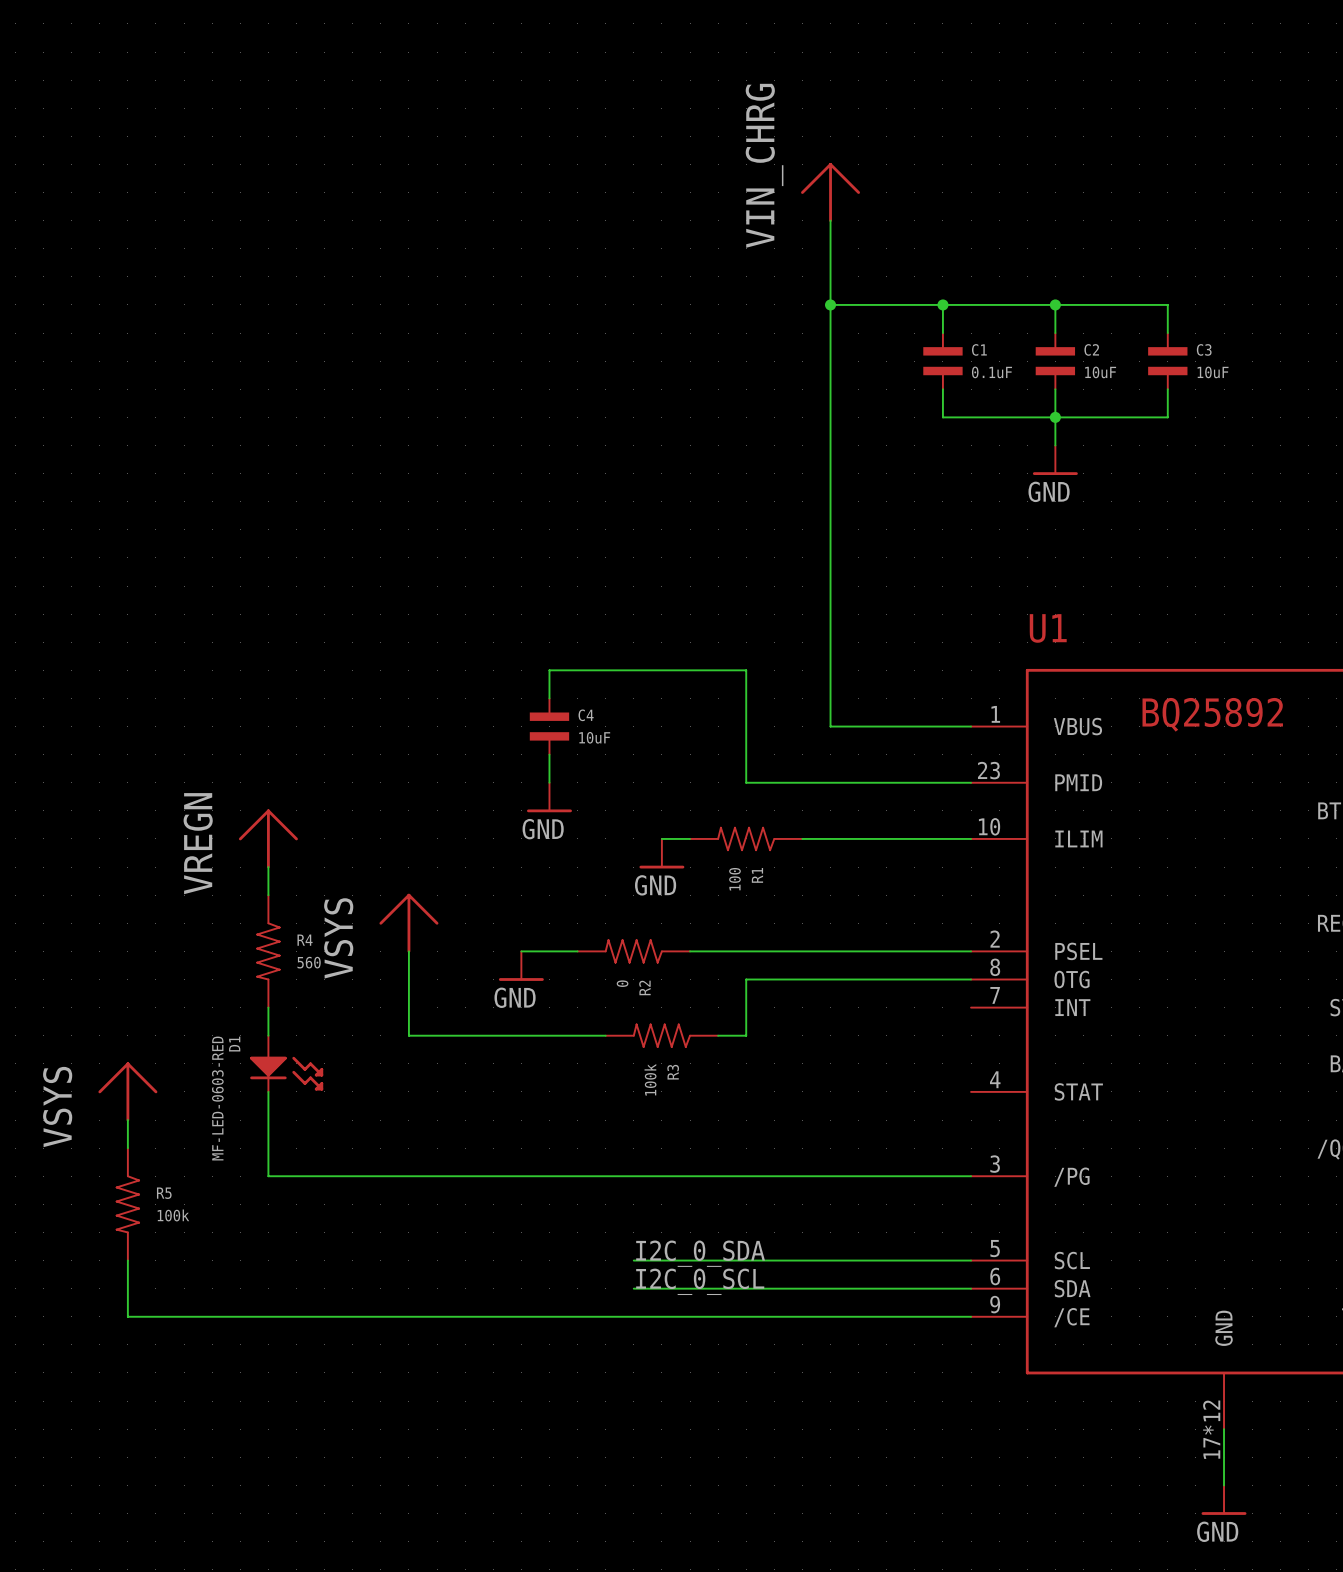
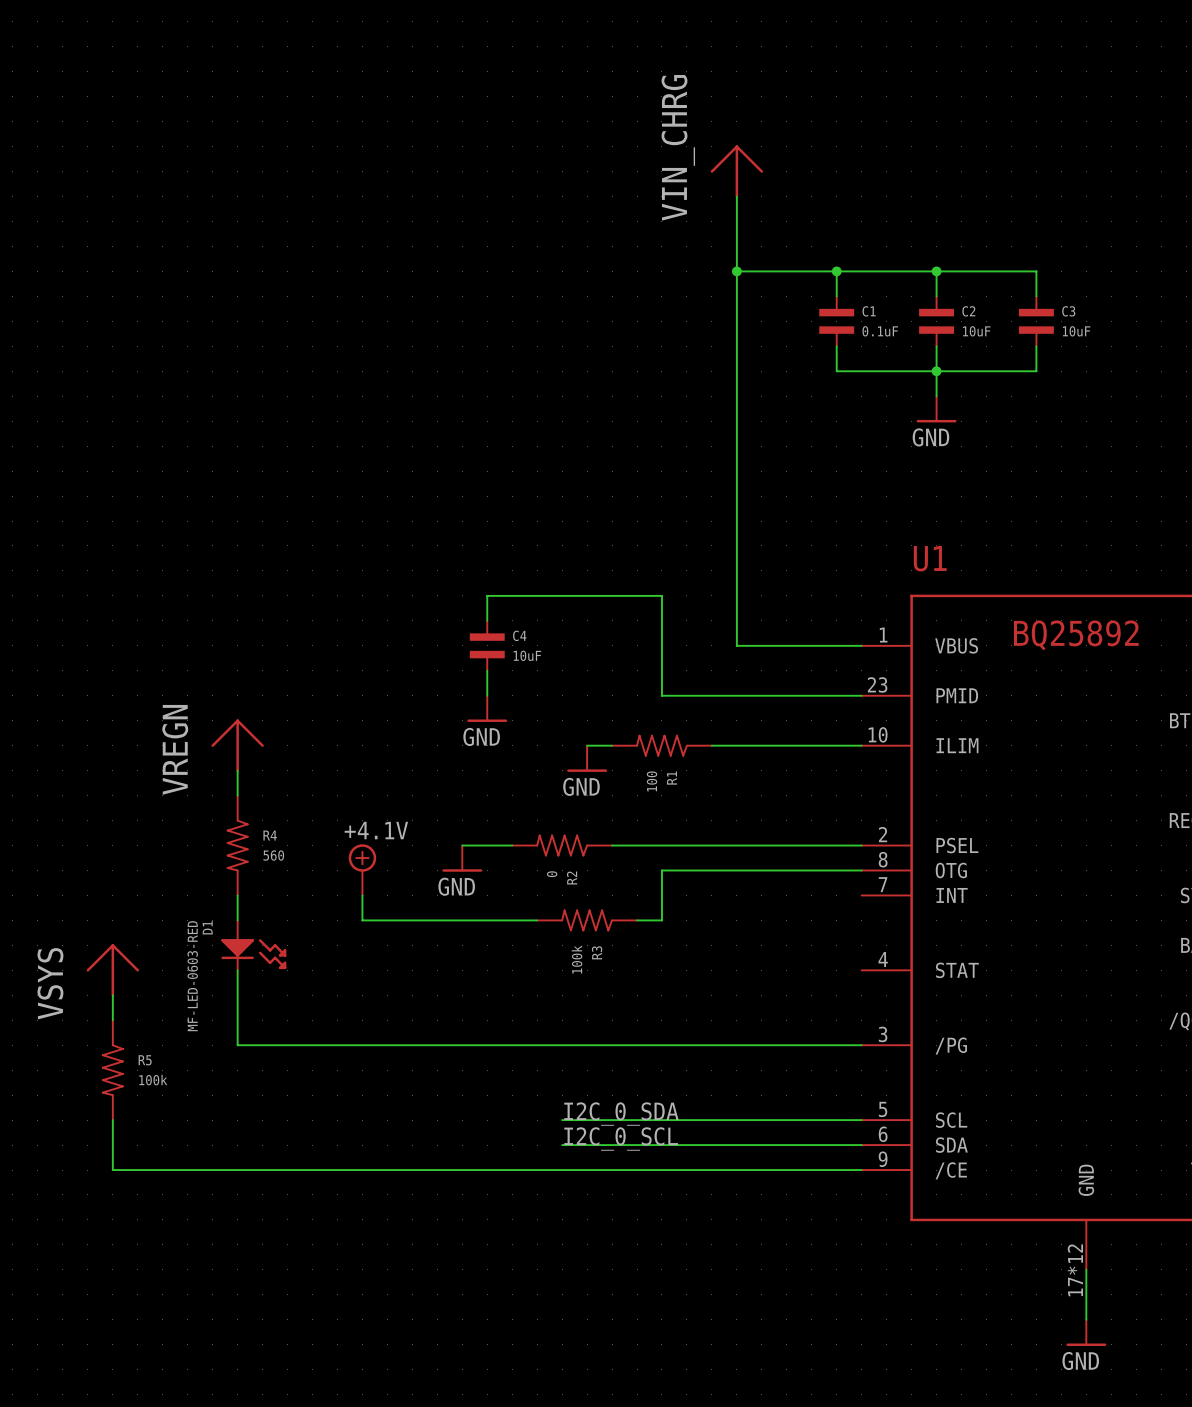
power symbol: VSYS (408, 923) -> none
power symbol: none -> +4.1V (362, 869)

